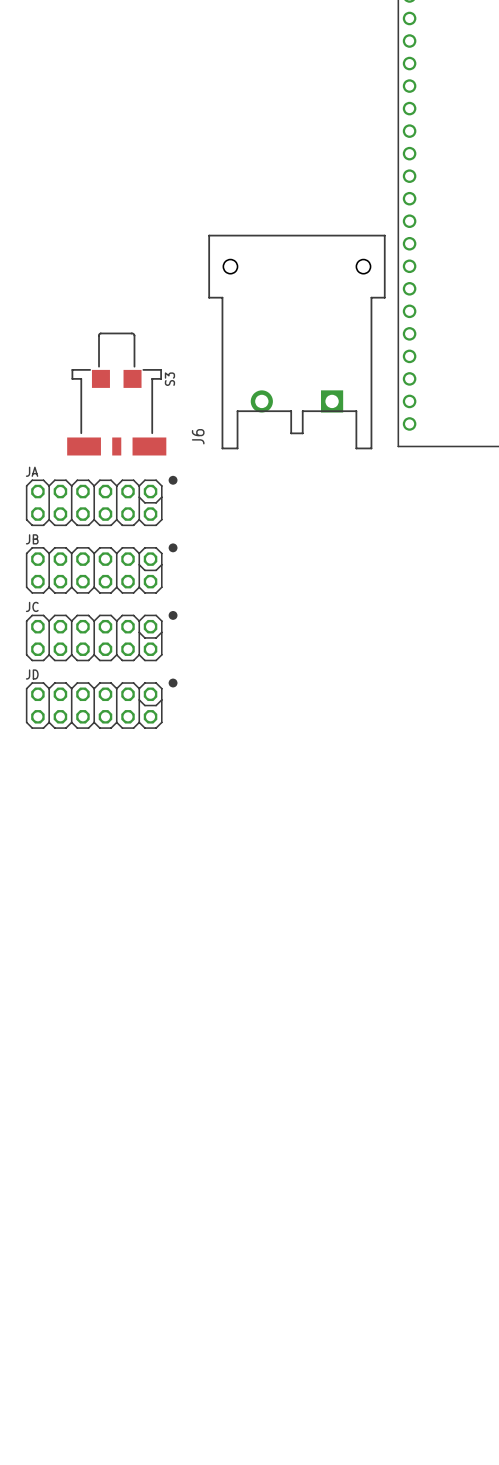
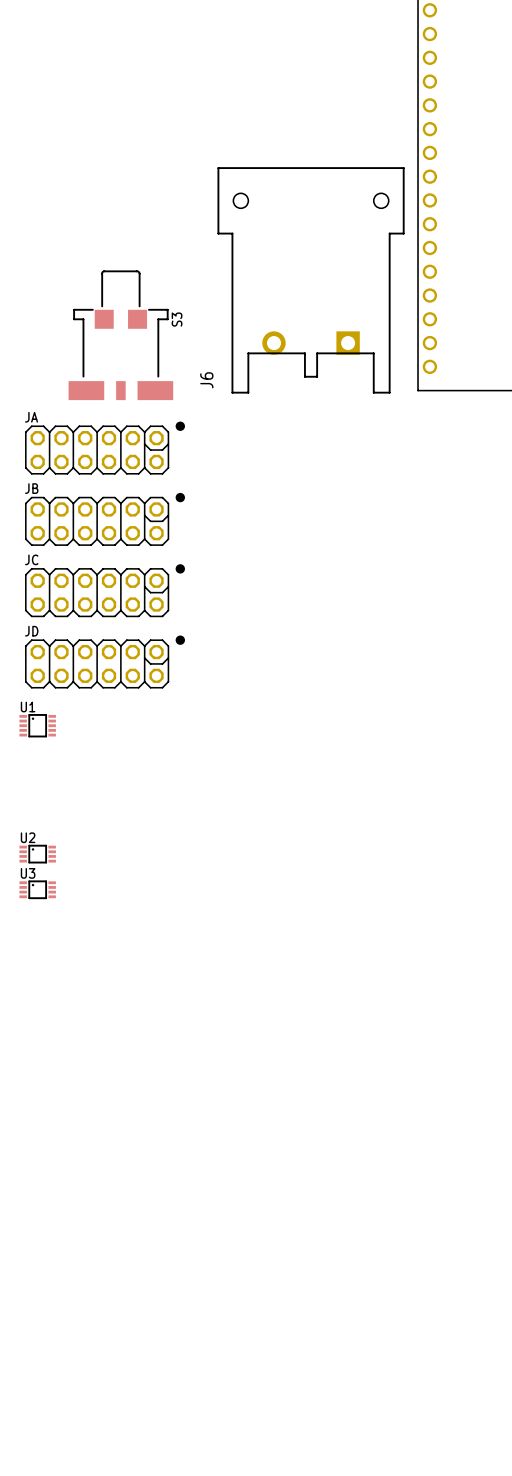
U1: none -> (37, 725)
U2: none -> (37, 854)
U3: none -> (37, 889)

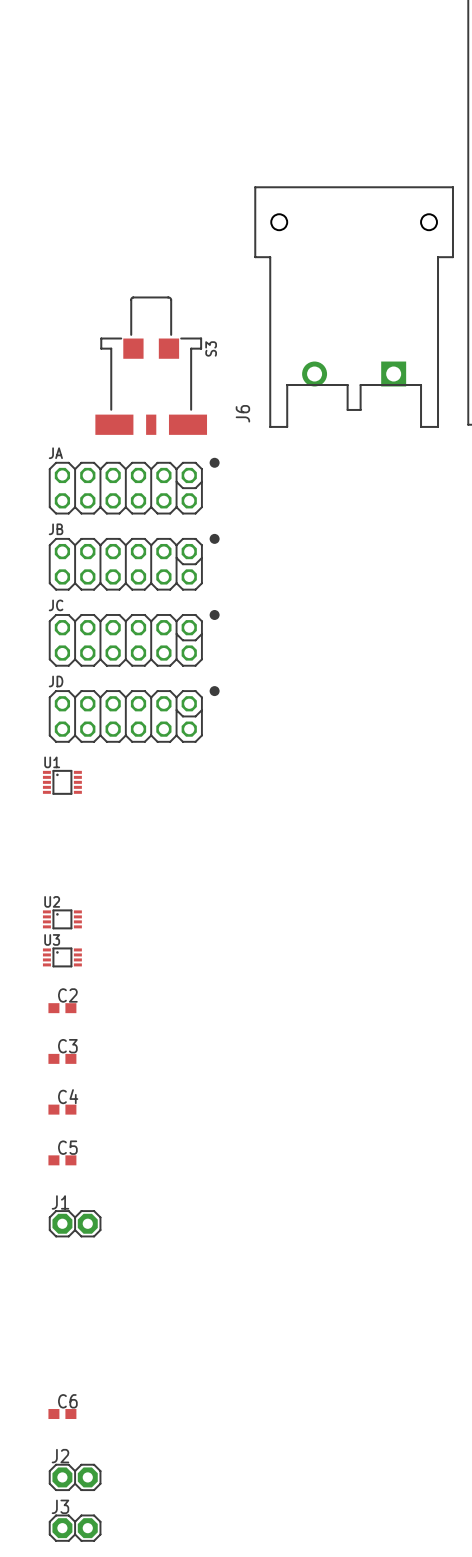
C2: none -> (62, 1008)
C3: none -> (62, 1058)
C4: none -> (62, 1109)
C5: none -> (62, 1160)
J1: none -> (75, 1223)
C6: none -> (62, 1414)
J2: none -> (75, 1477)
J3: none -> (75, 1528)

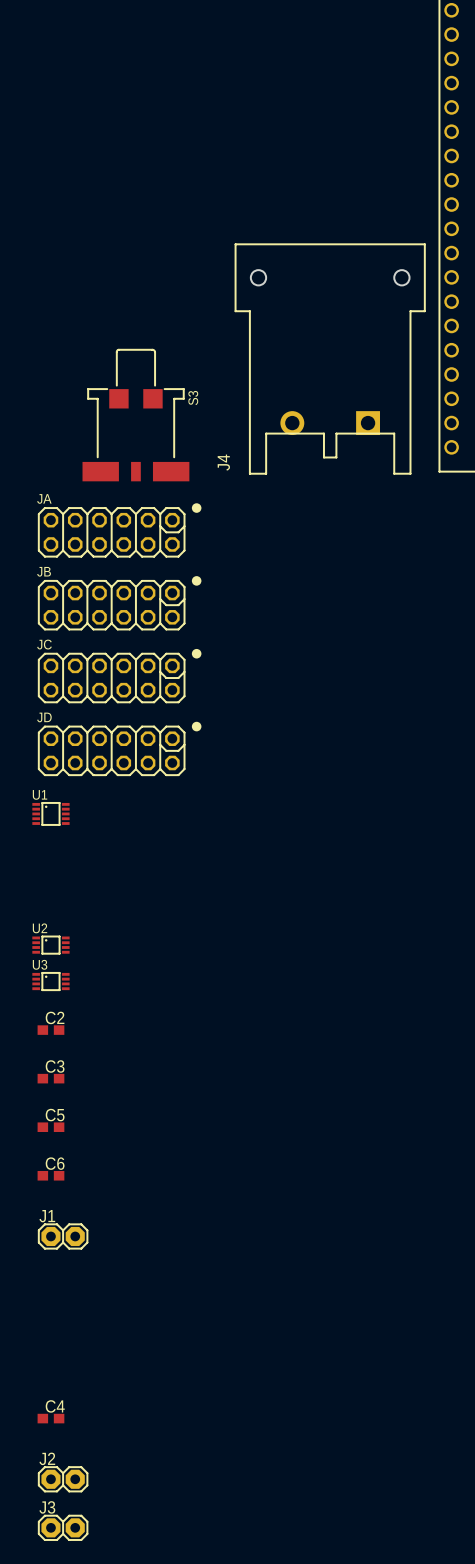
J6 name: J6 (242, 413) -> J4 (223, 462)
C4 name: C4 (68, 1096) -> C5 (55, 1115)
C5 name: C5 (67, 1147) -> C6 (55, 1163)
C6 name: C6 (67, 1401) -> C4 (55, 1406)

